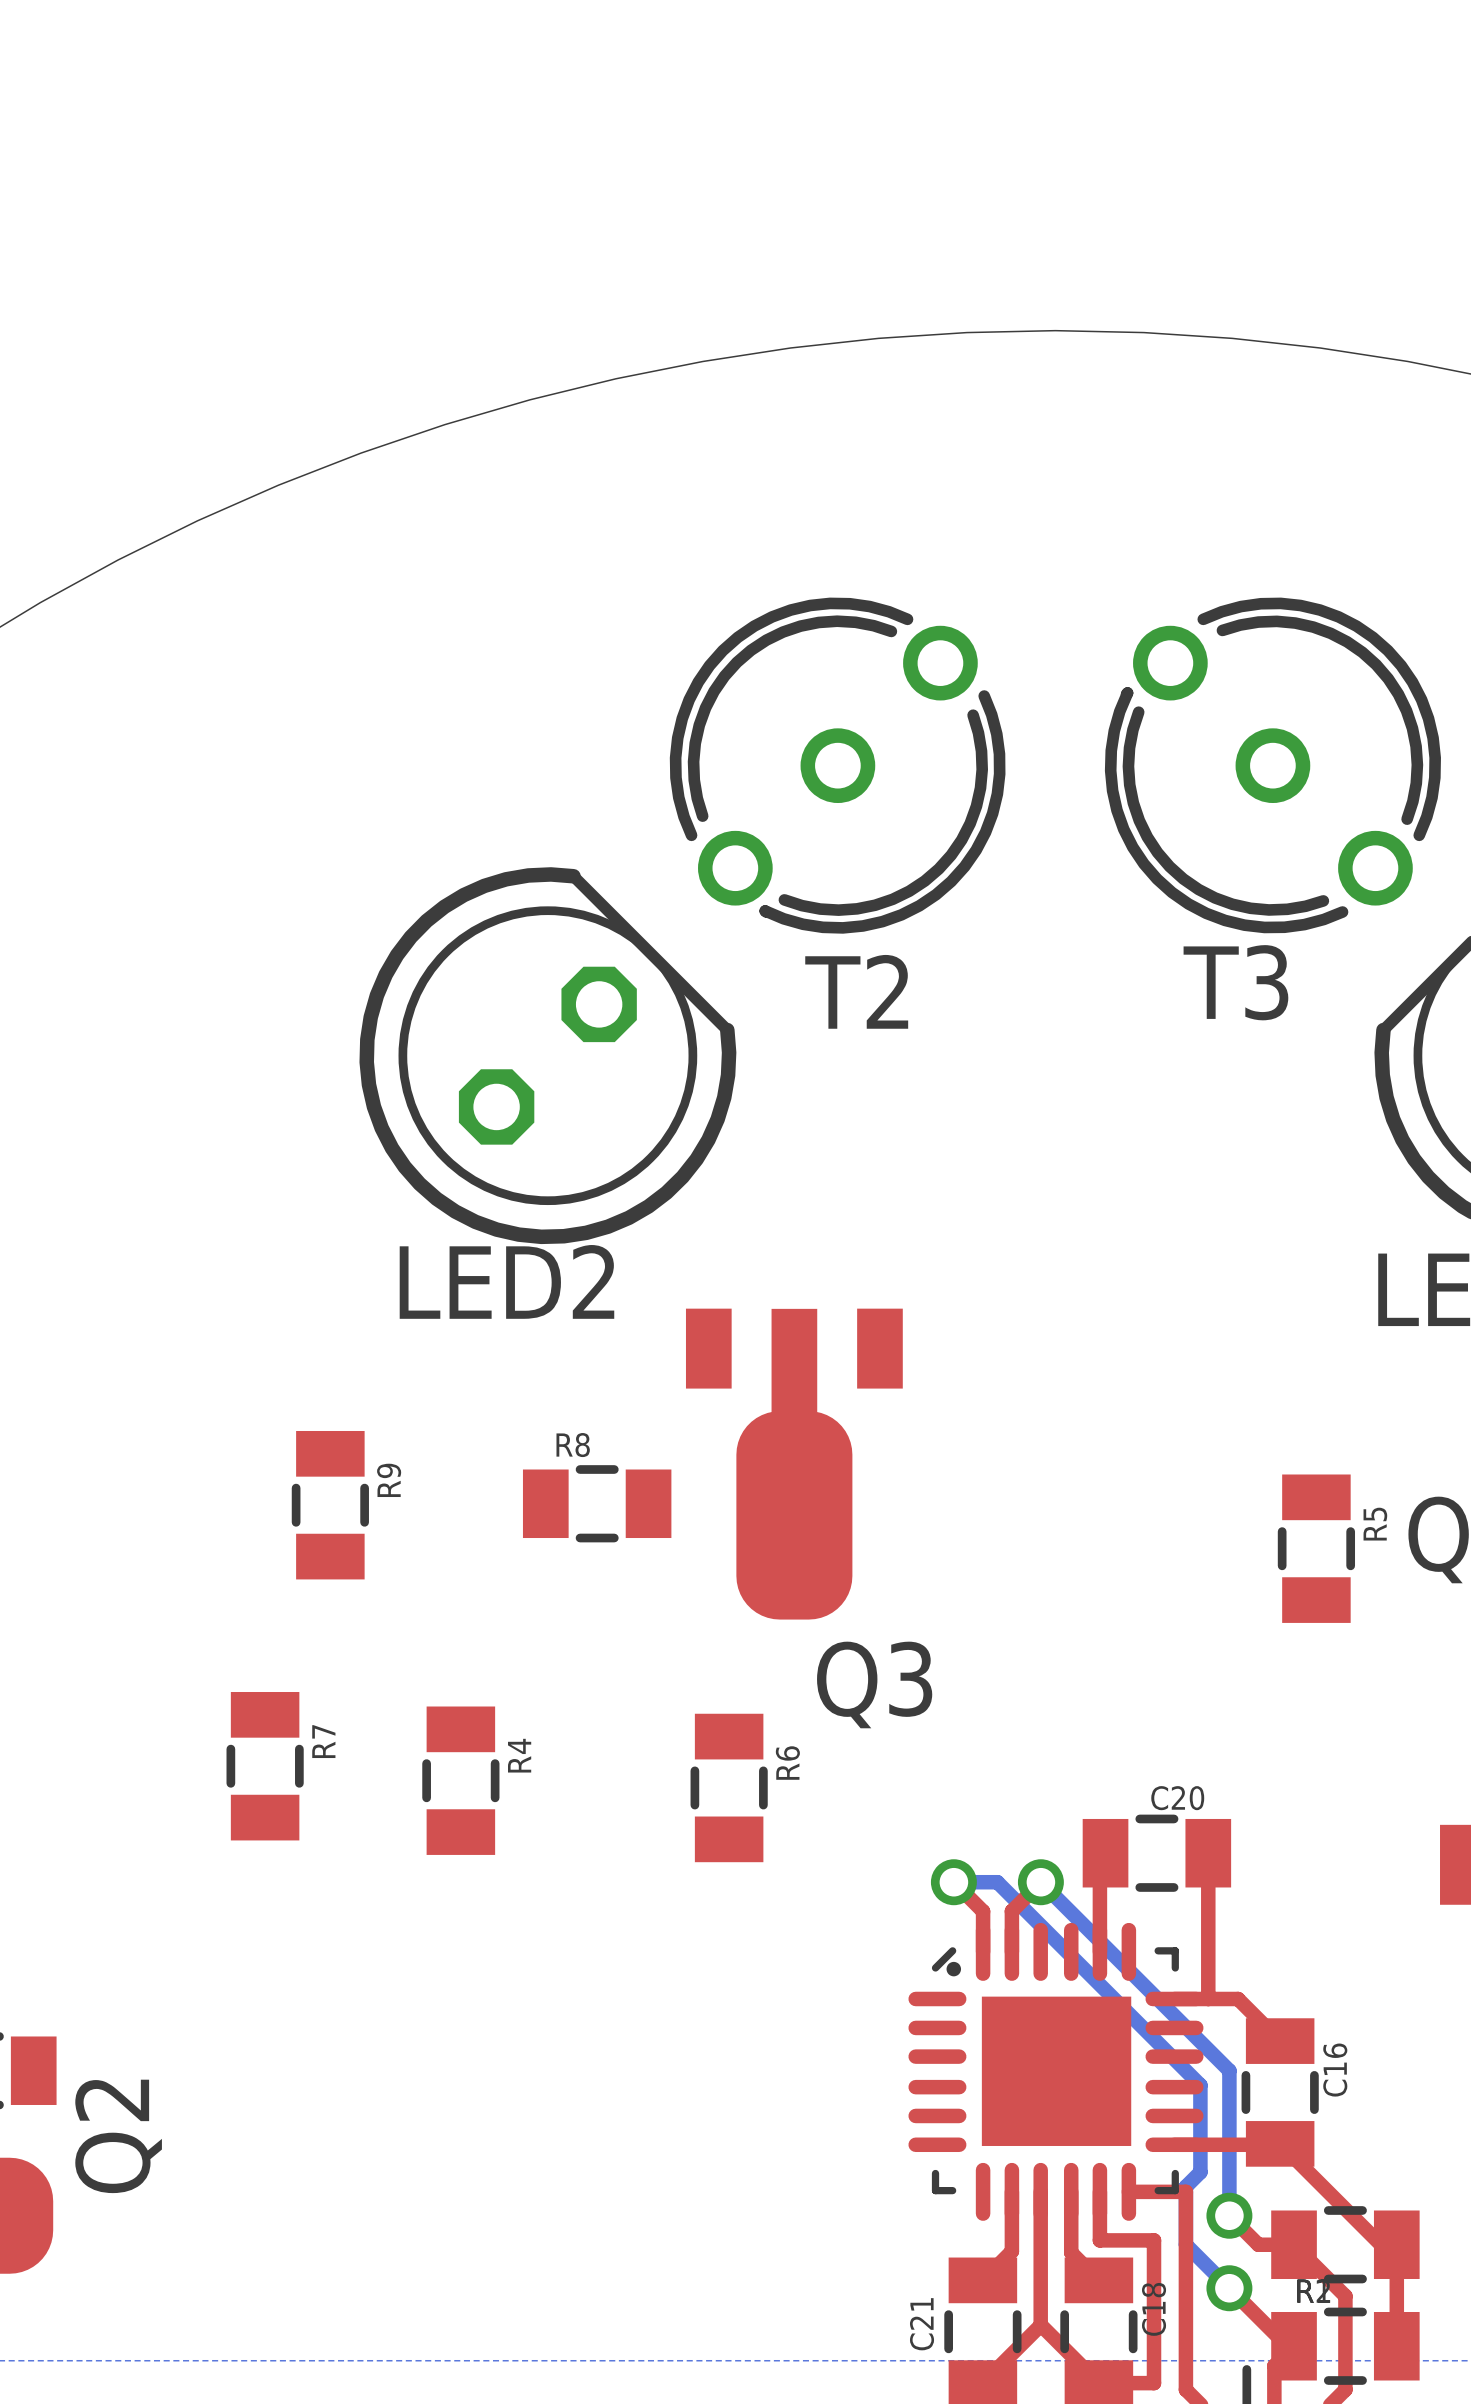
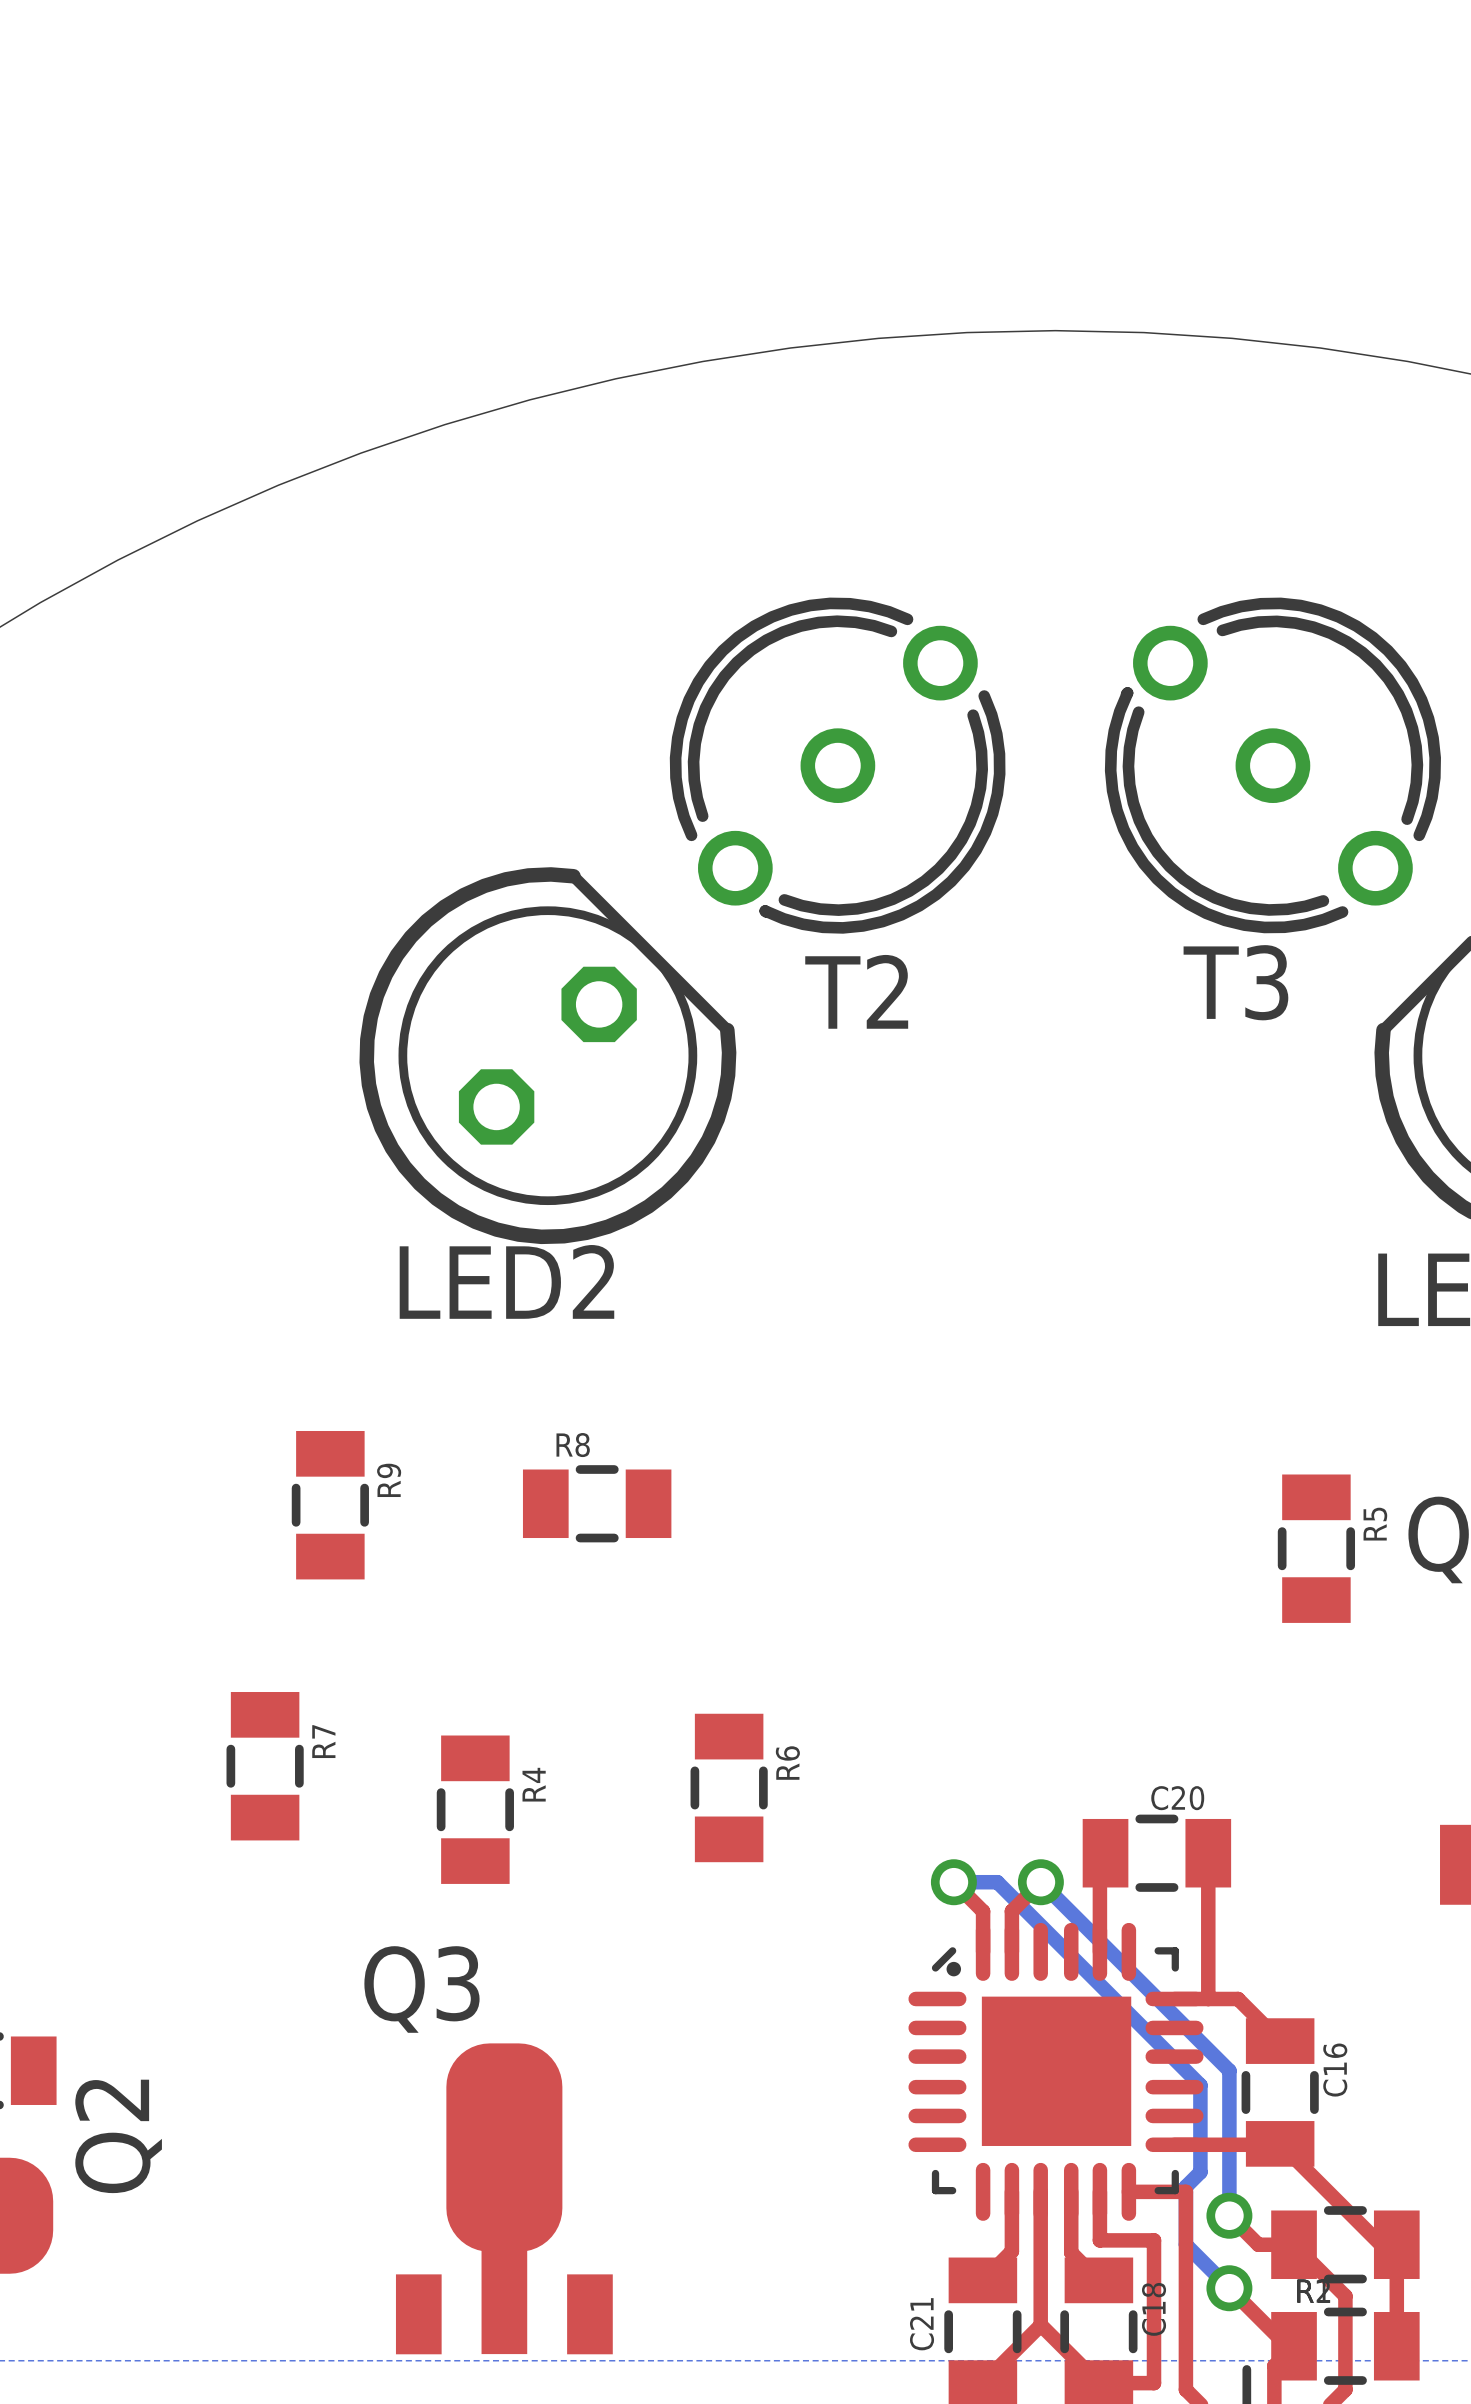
Q3 rotation: 0° (794, 1464) -> 180° (504, 2198)
Q3 position: (794, 1464) -> (504, 2198)
R4 position: (460, 1780) -> (475, 1809)

